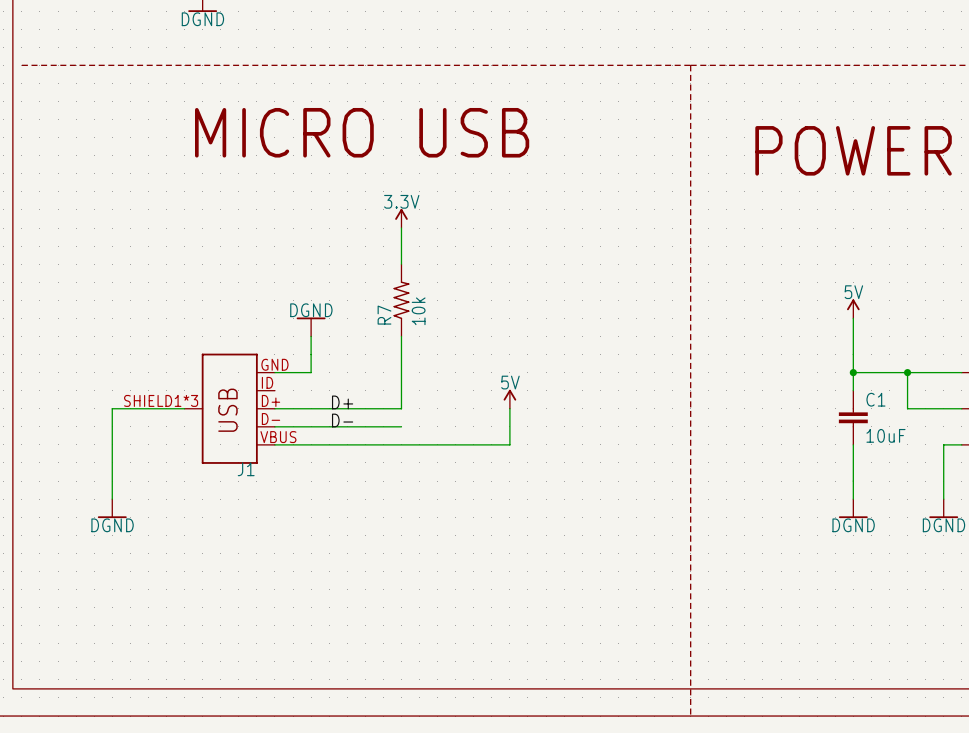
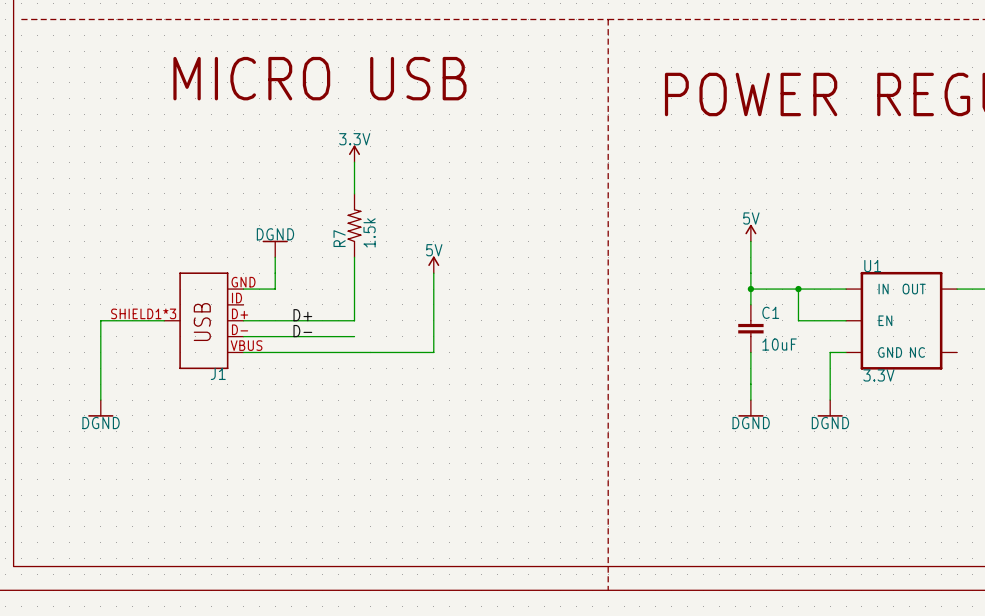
R7 value: 10k (418, 311) -> 1.5k (369, 232)
power symbol position: 5V (509, 399) -> 5V (433, 264)
wire: (509, 408) (509, 444) (491, 444) -> (433, 273) (433, 352)

